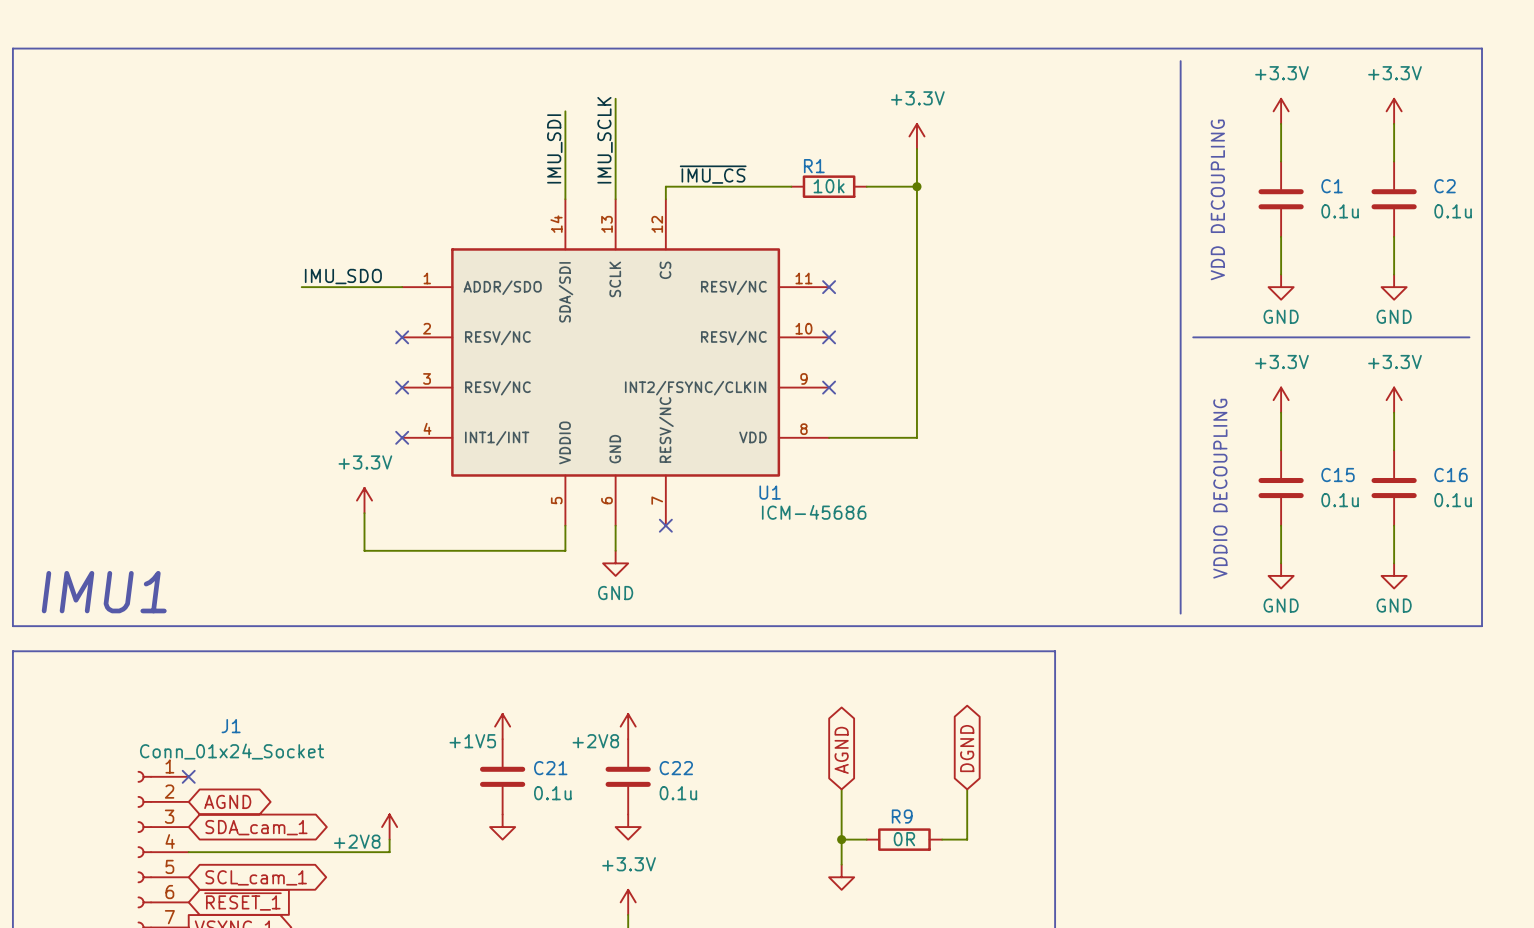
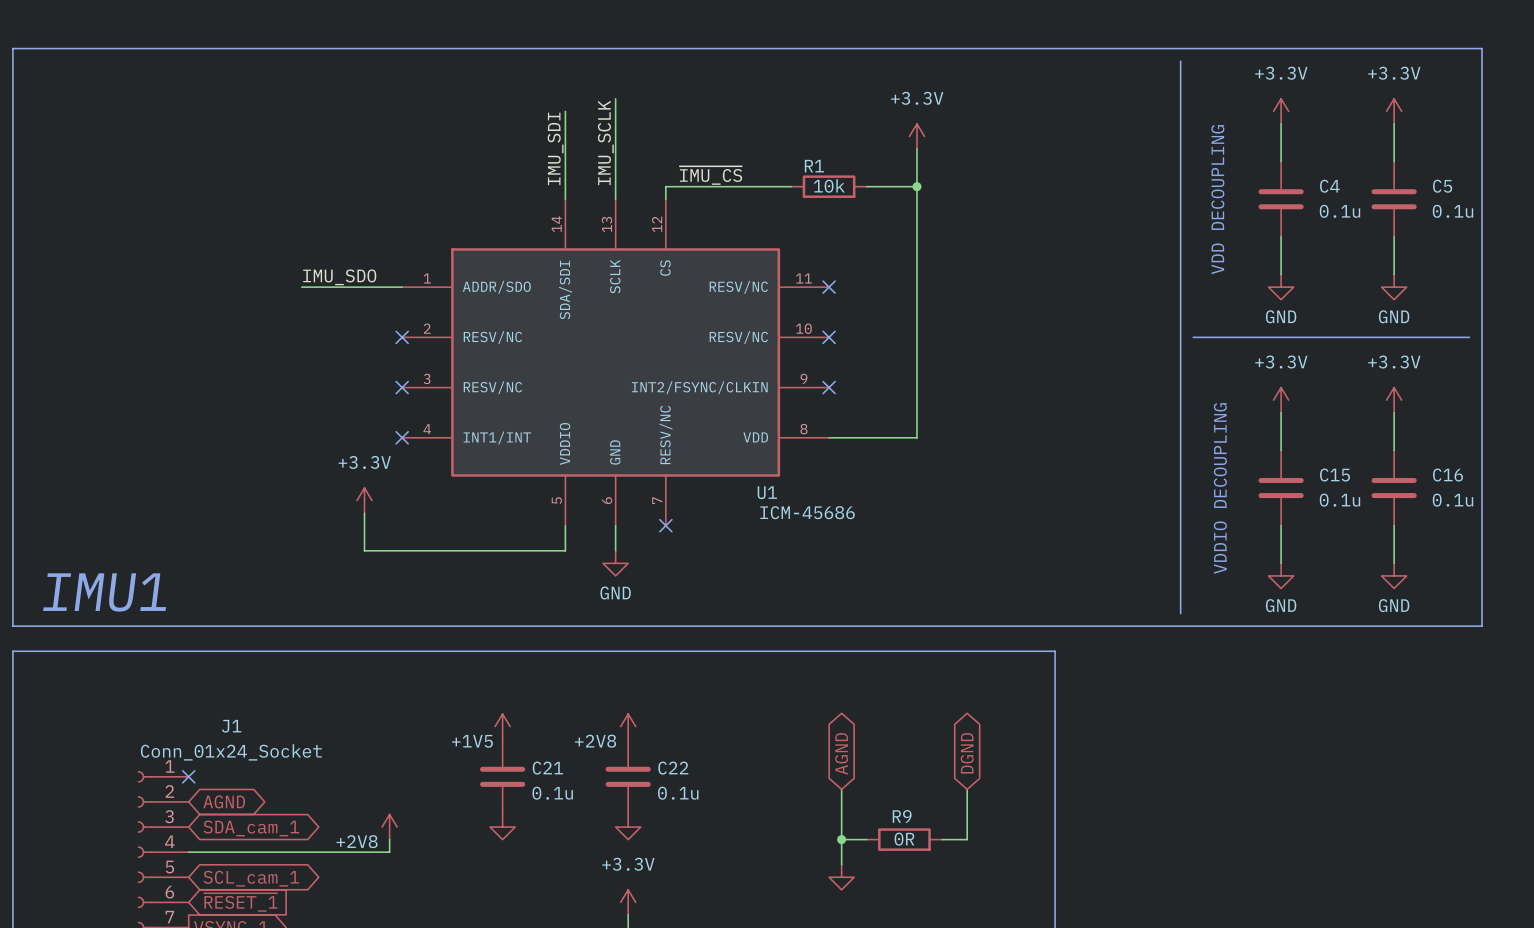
C1 name: C1 (1332, 186) -> C4 (1329, 186)
C2 name: C2 (1445, 186) -> C5 (1442, 186)

